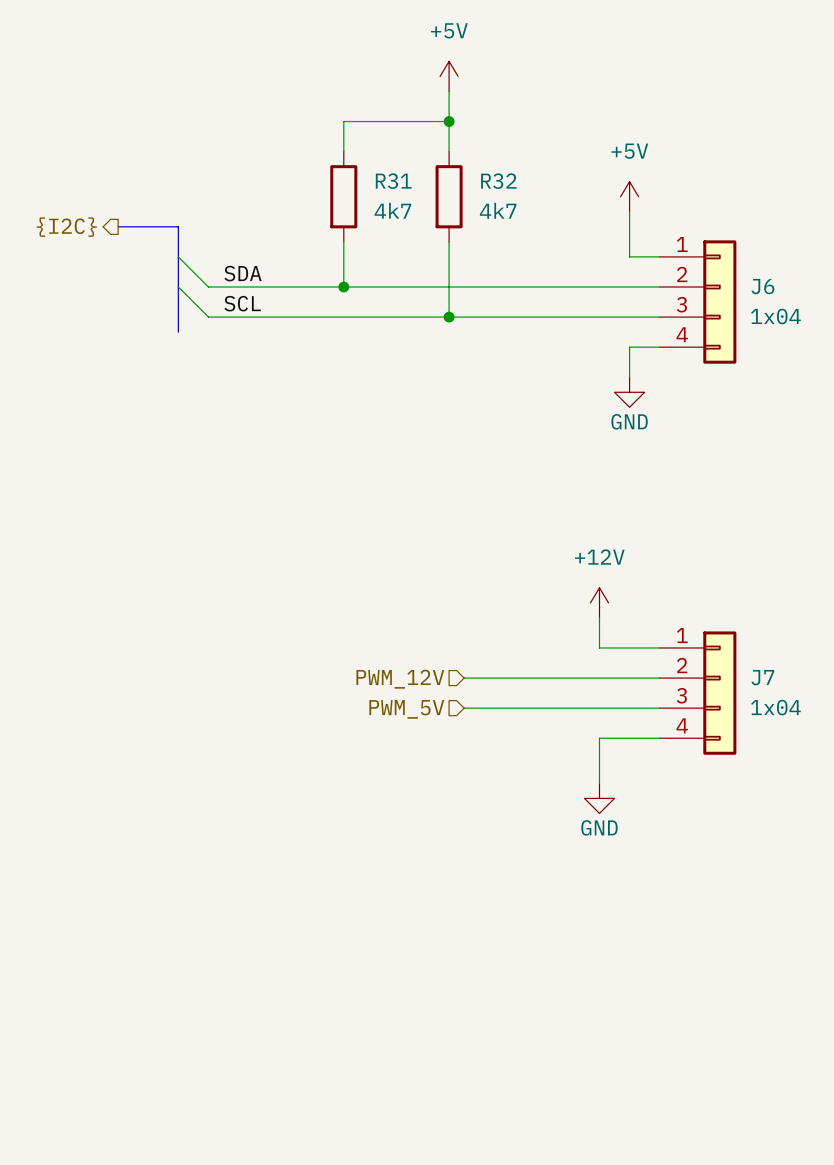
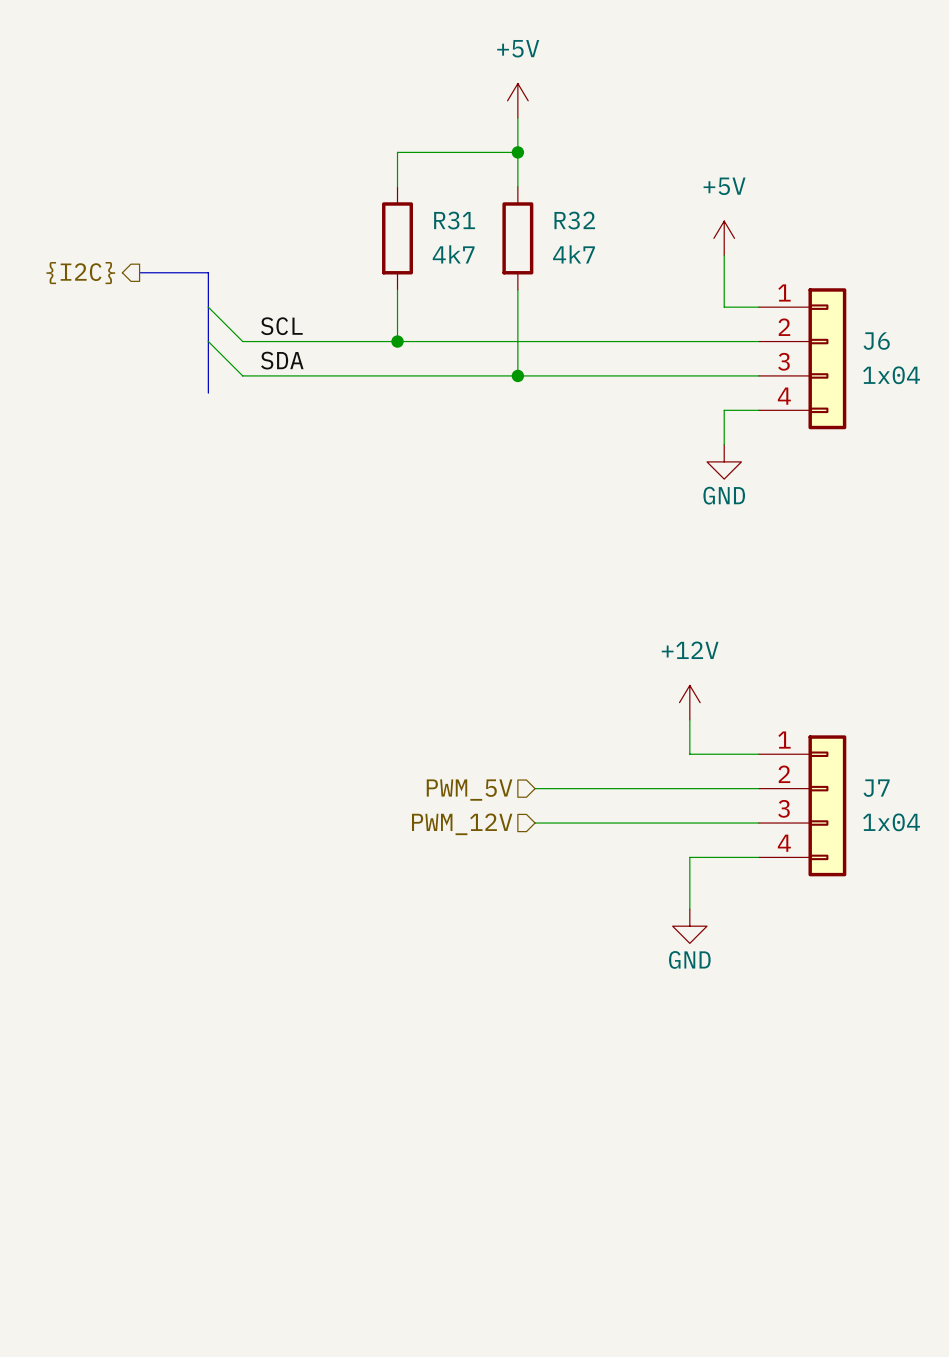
label: SDA (243, 273) -> SCL (281, 326)
label: SCL (242, 303) -> SDA (282, 360)
hierarchical label: PWM_12V (400, 679) -> PWM_5V (469, 790)
hierarchical label: PWM_5V (406, 709) -> PWM_12V (462, 824)

